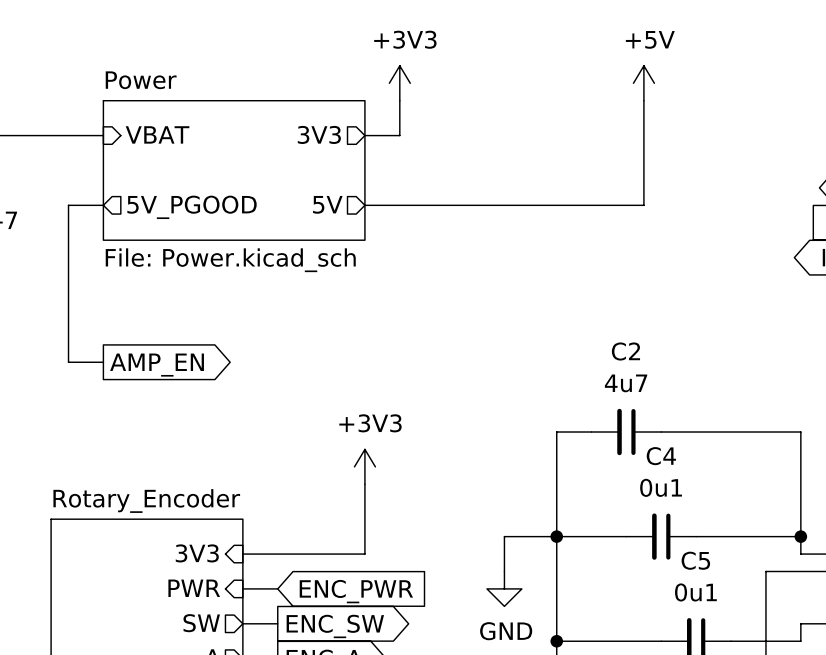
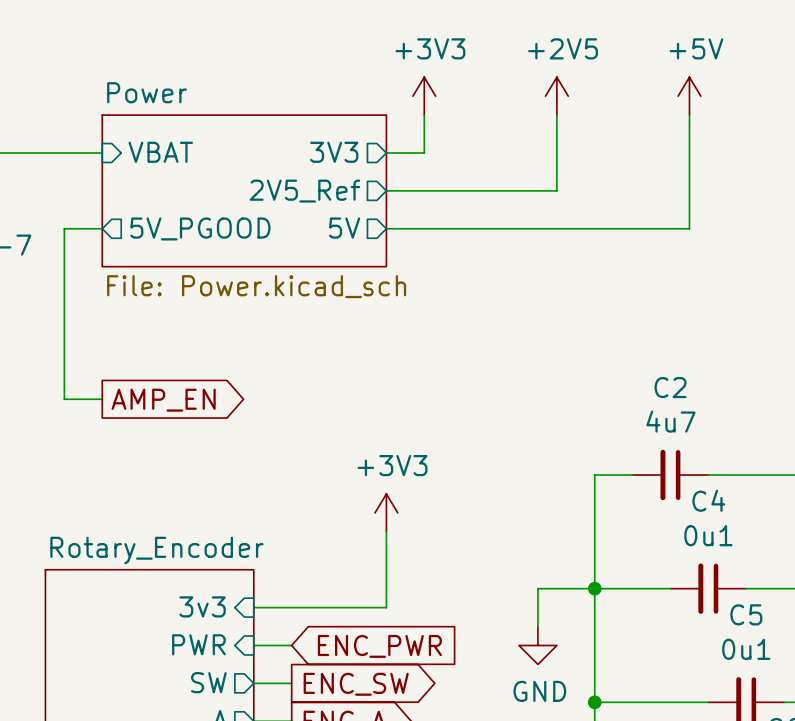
power symbol: none -> +2V5 (556, 96)
wire: none -> (556, 115) (556, 190) (386, 190)
sheet pin: none -> 2V5_Ref (304, 191)
sheet pin: 3V3 (197, 553) -> 3v3 (202, 606)

